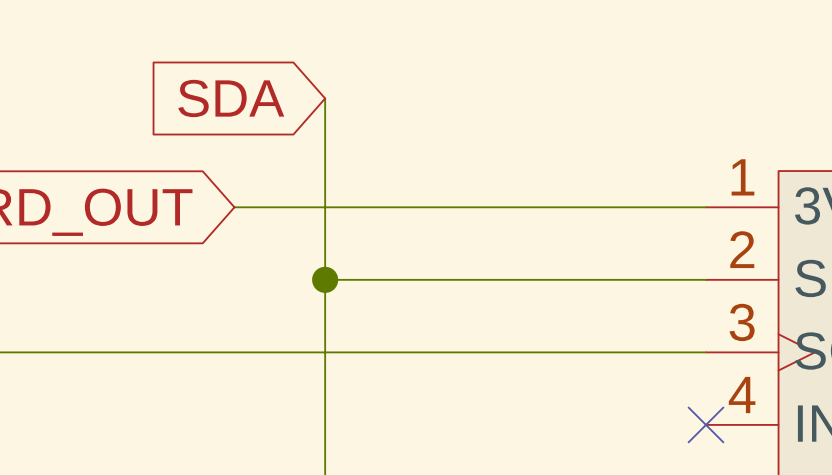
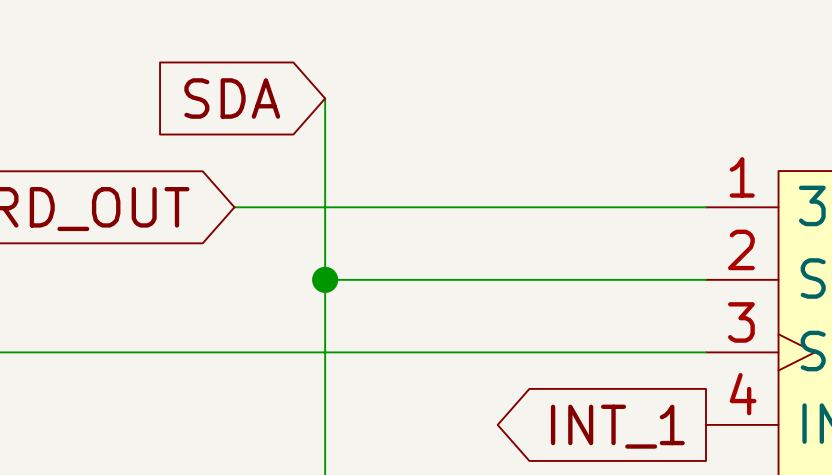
no-connect mark: (705, 424) -> none
global label: none -> INT_1 (617, 426)

